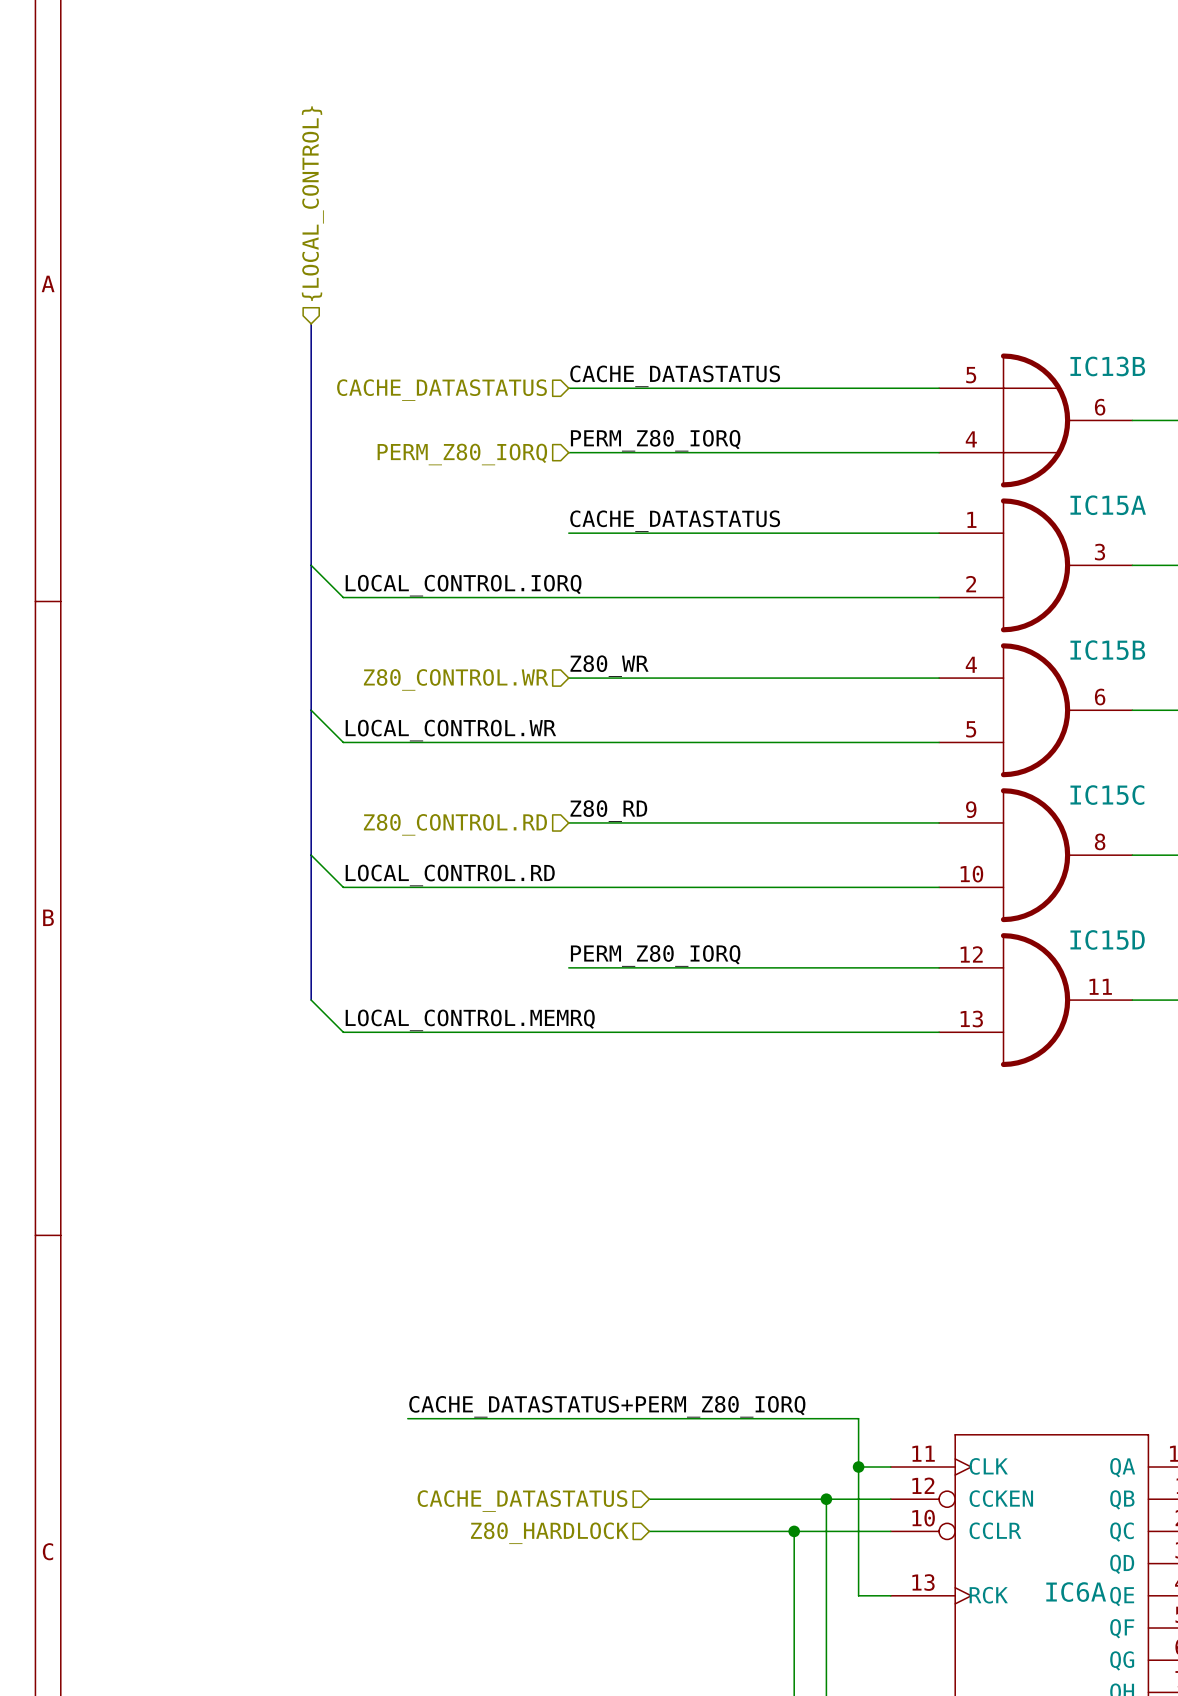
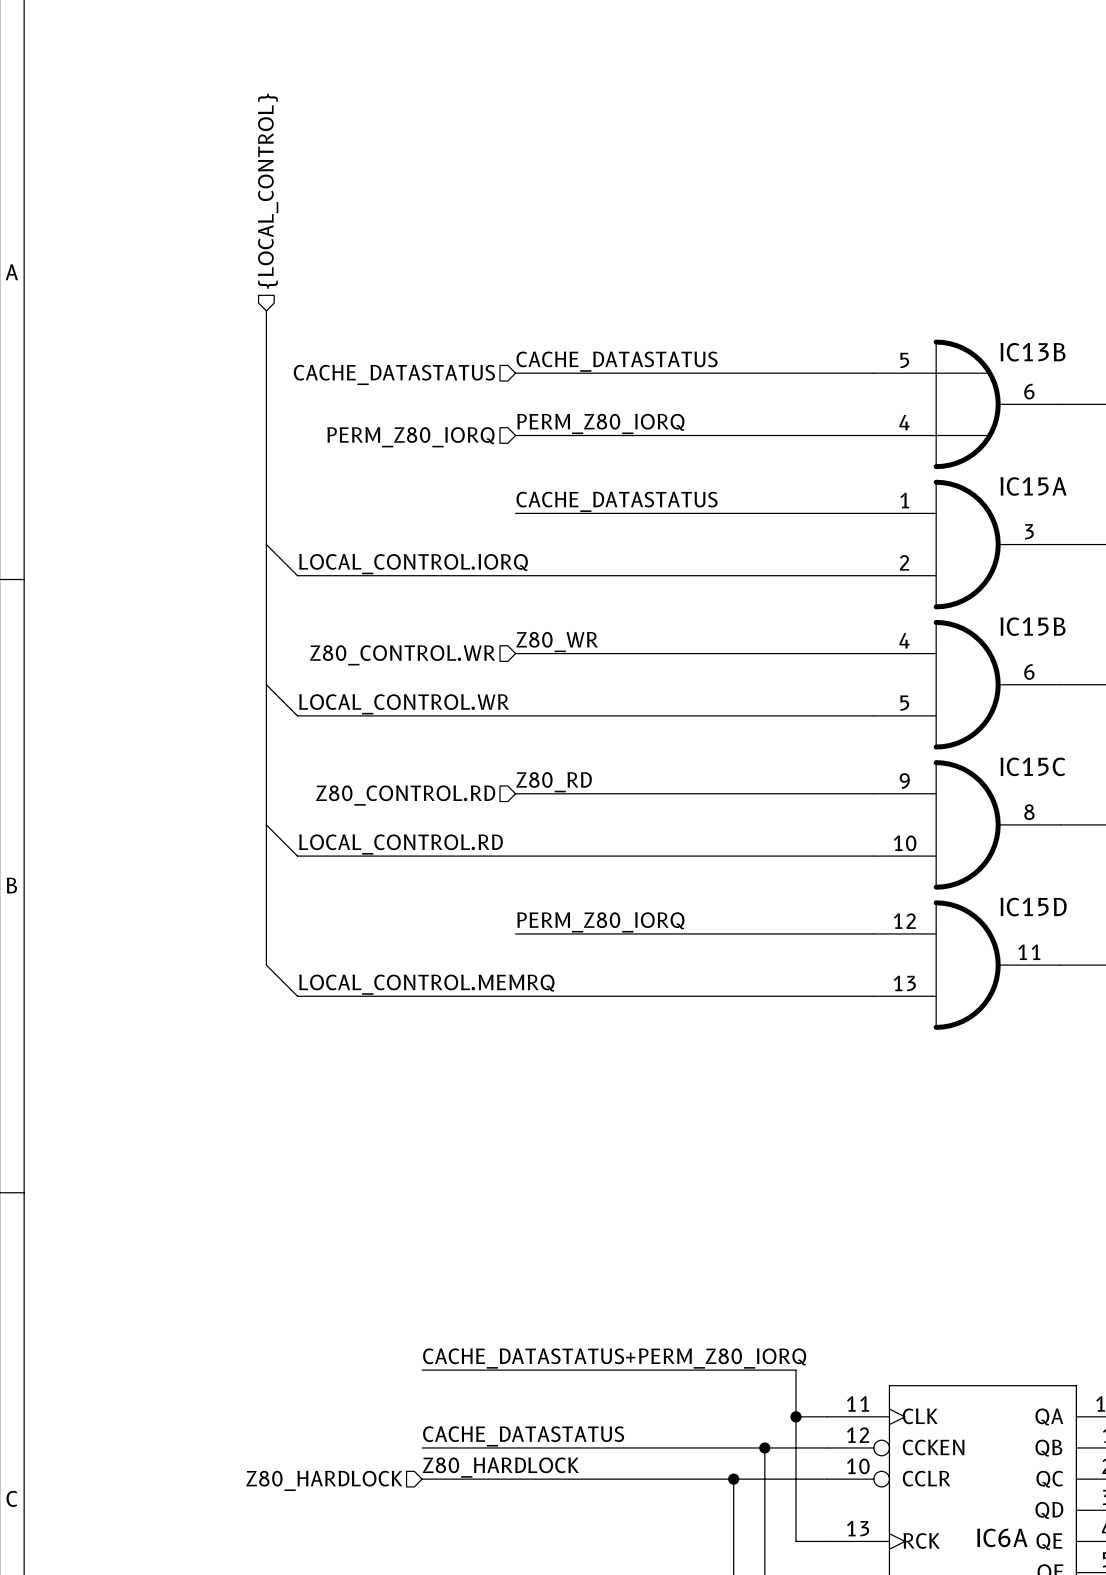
label position: CACHE_DATASTATUS+PERM_Z80_IORQ (607, 1406) -> CACHE_DATASTATUS+PERM_Z80_IORQ (614, 1358)
wire: (407, 1418) (472, 1418) -> none
label: none -> CACHE_DATASTATUS (523, 1436)
wire: none -> (422, 1447) (593, 1447)
hierarchical label: CACHE_DATASTATUS (522, 1501) -> none
label: none -> Z80_HARDLOCK (500, 1467)
wire: none -> (422, 1479) (593, 1479)
hierarchical label position: Z80_HARDLOCK (549, 1533) -> Z80_HARDLOCK (324, 1480)

